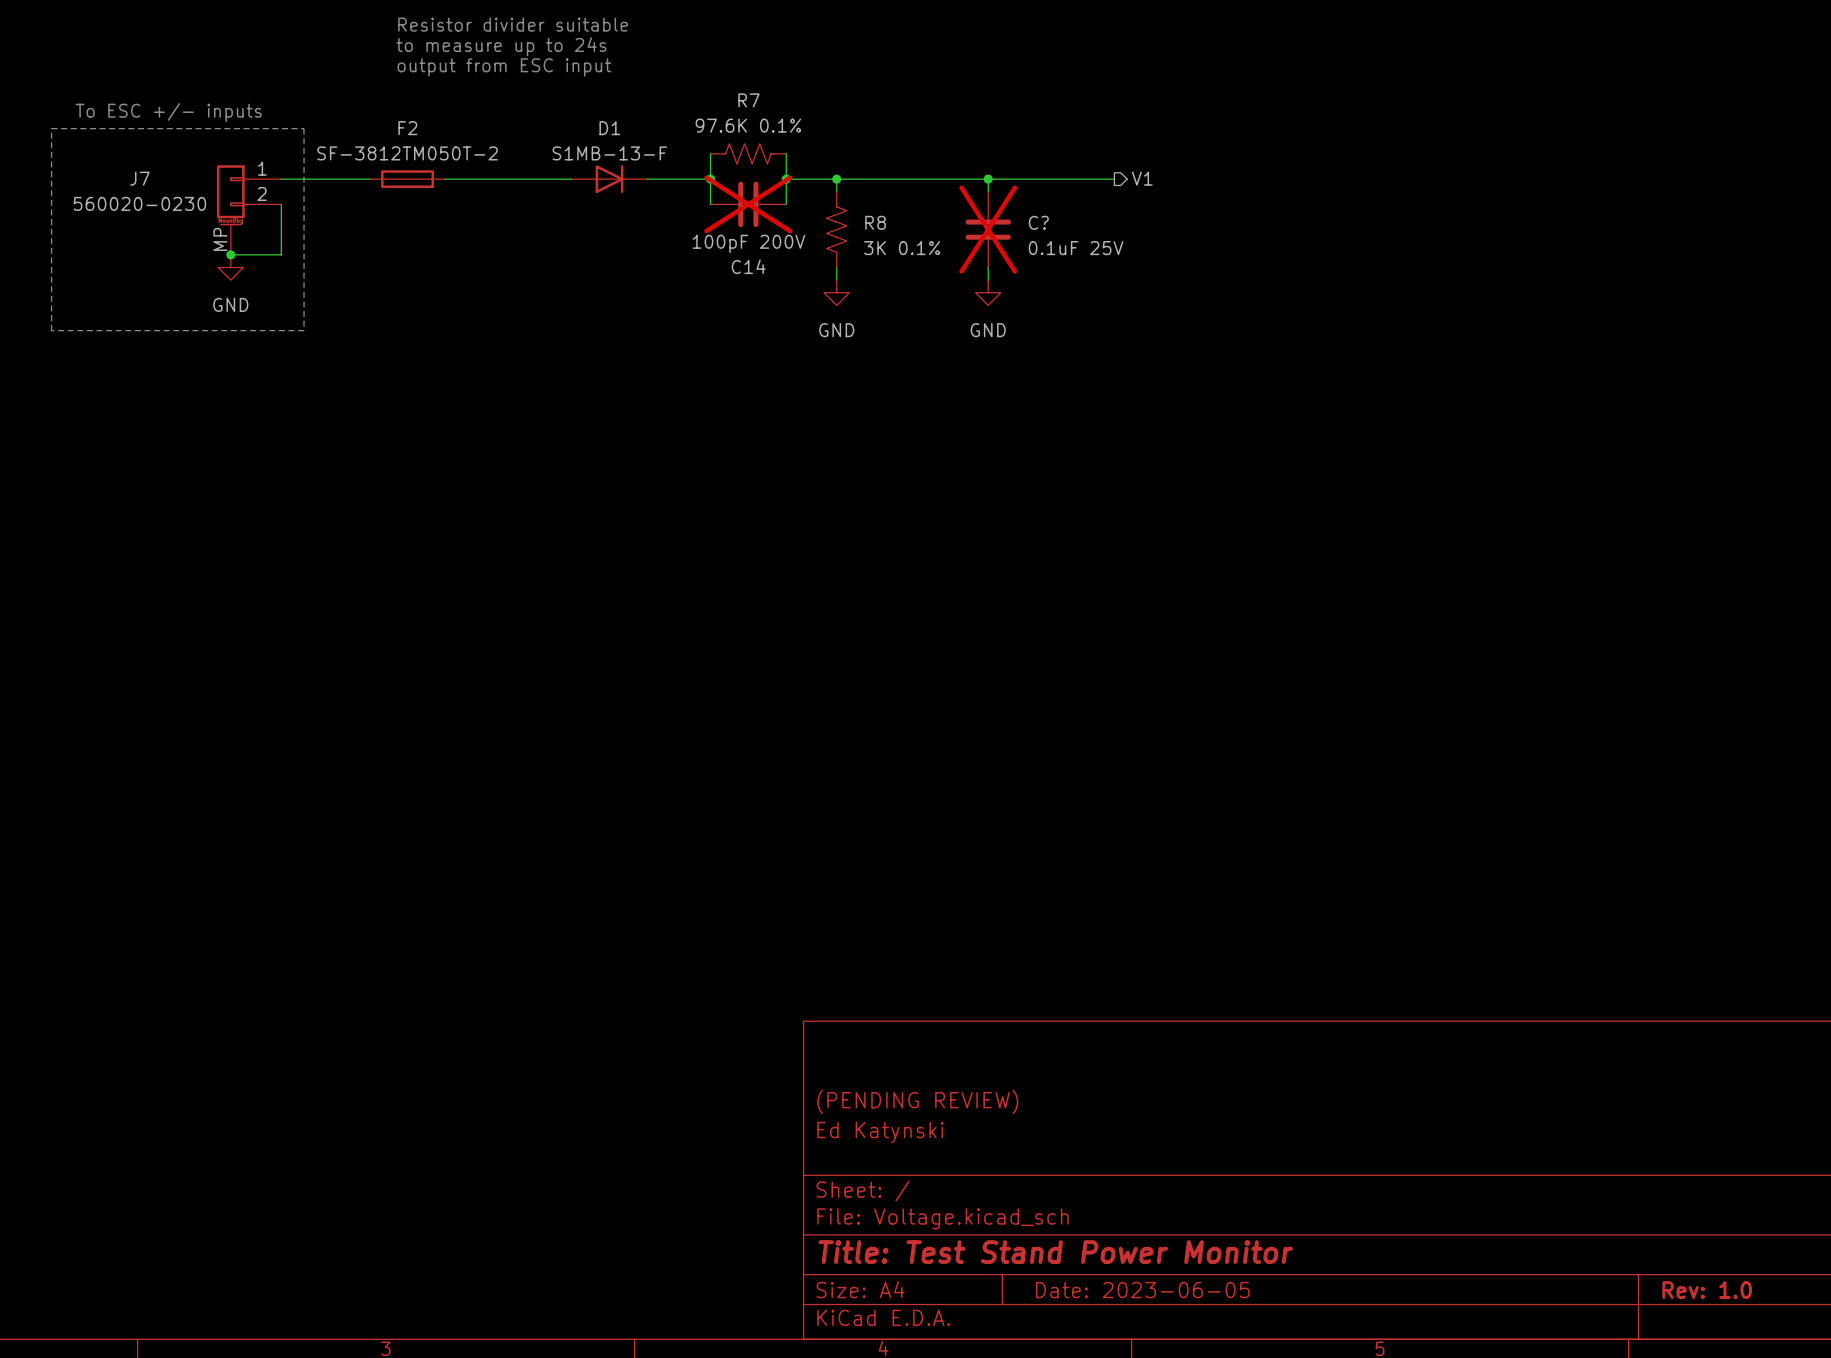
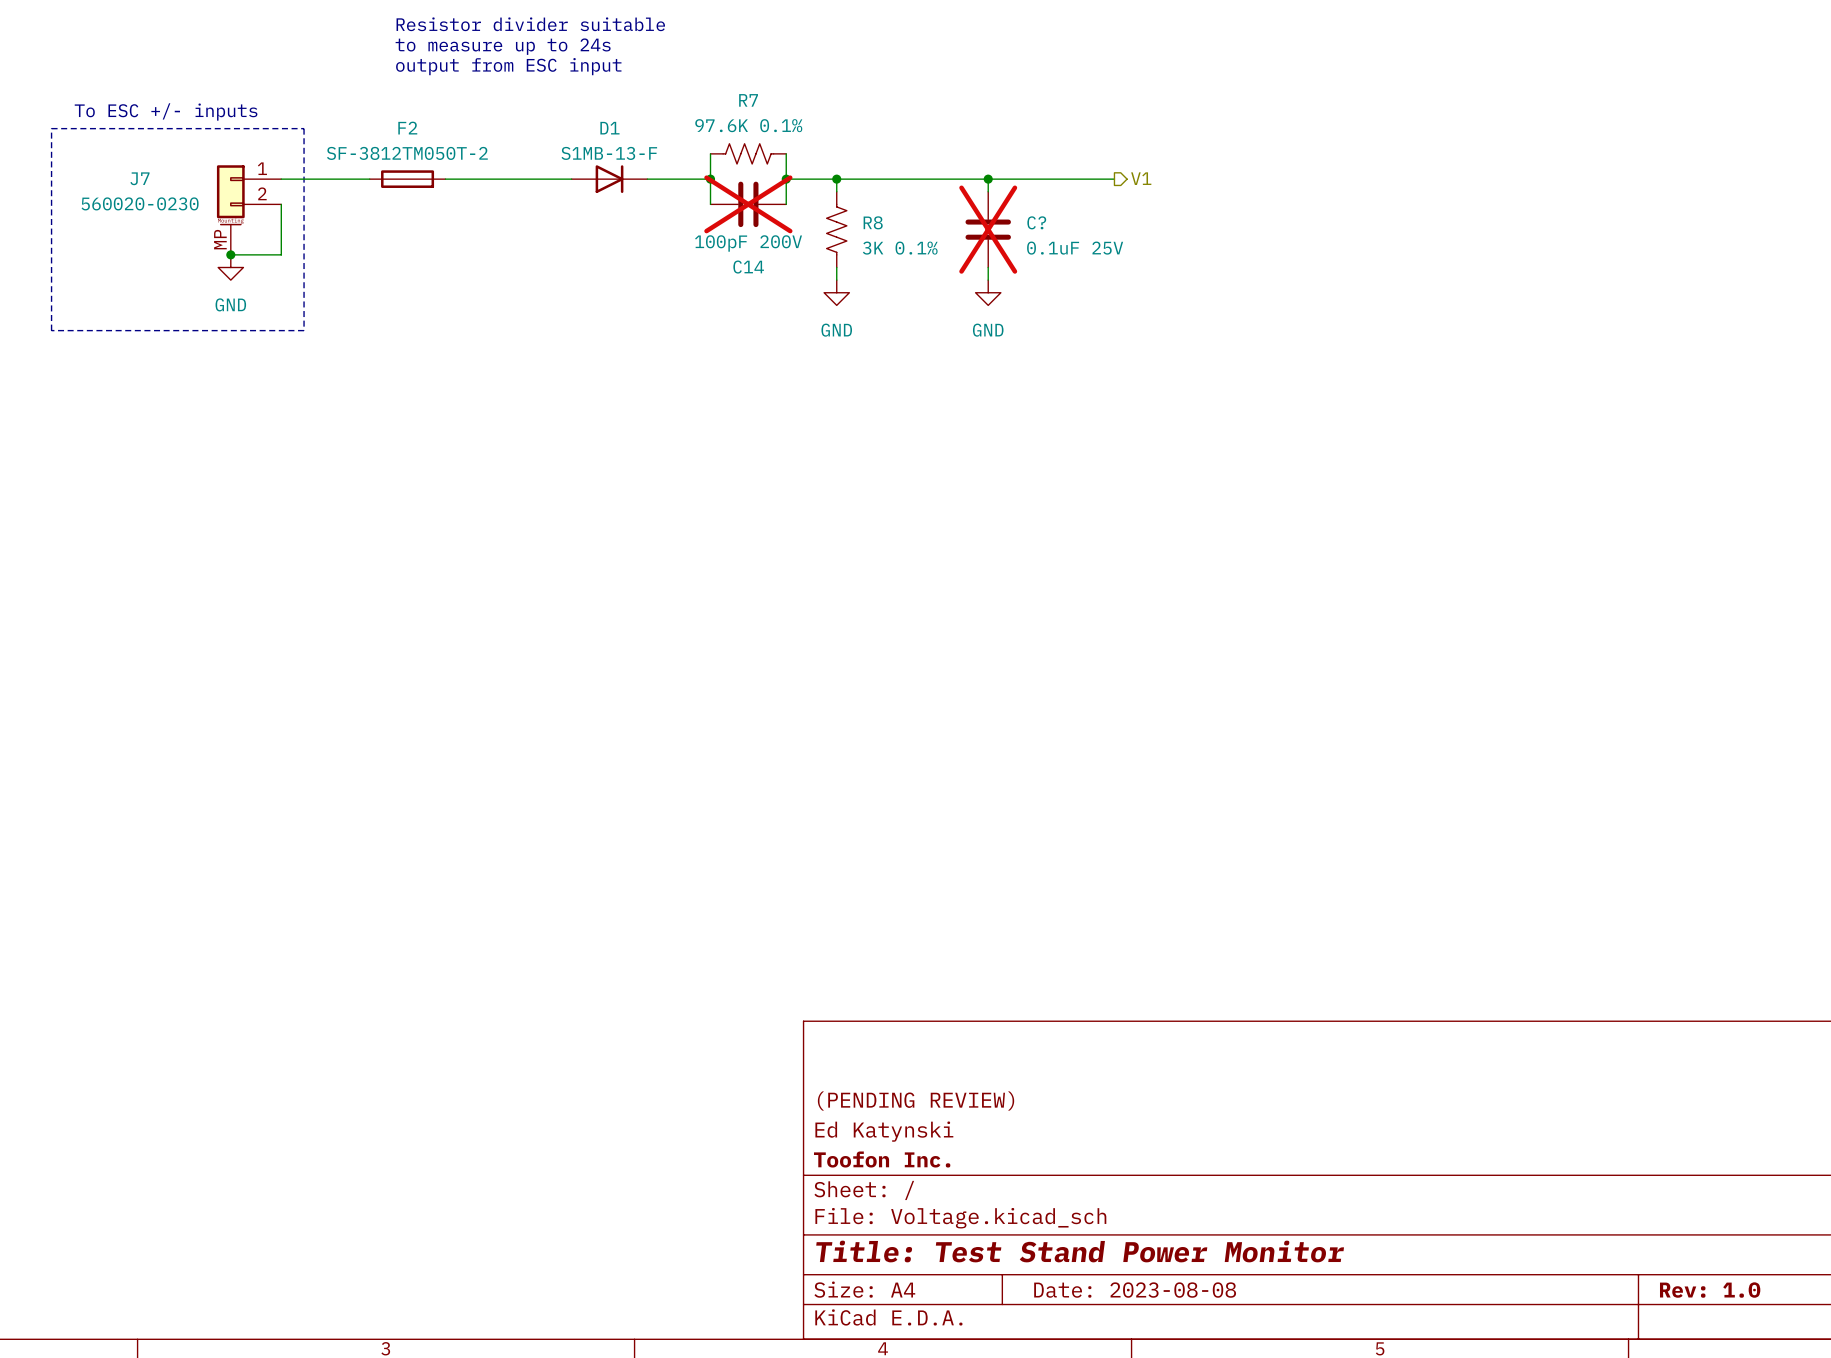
title block: none -> Toofon Inc. (882, 1159)
title block: Date: 2023-06-05 (1142, 1290) -> Date: 2023-08-08 (1135, 1290)

